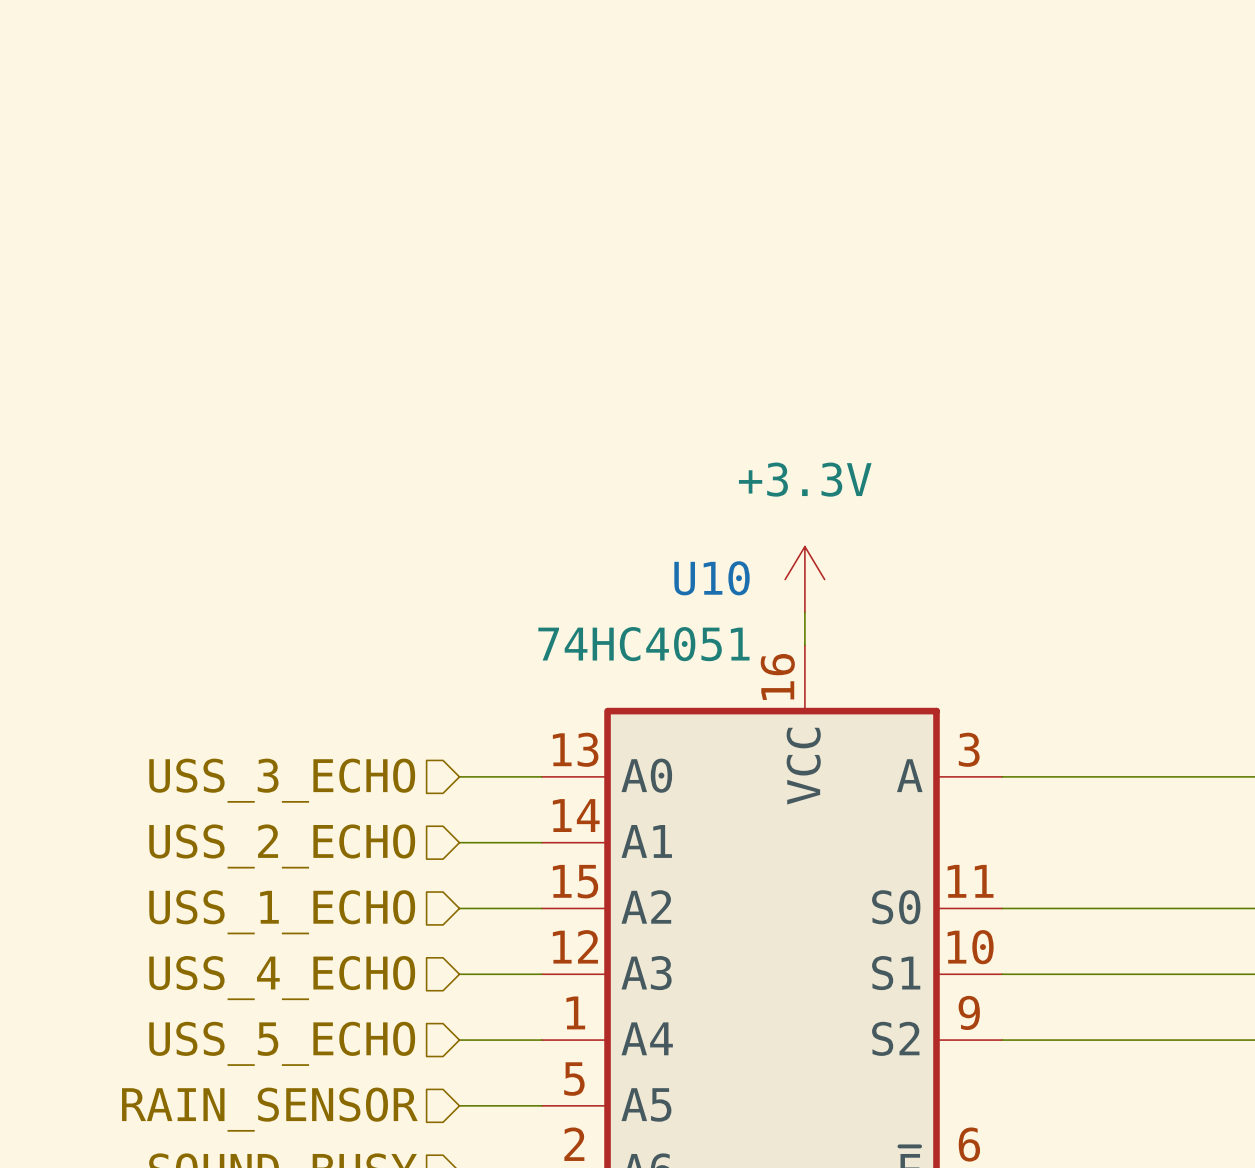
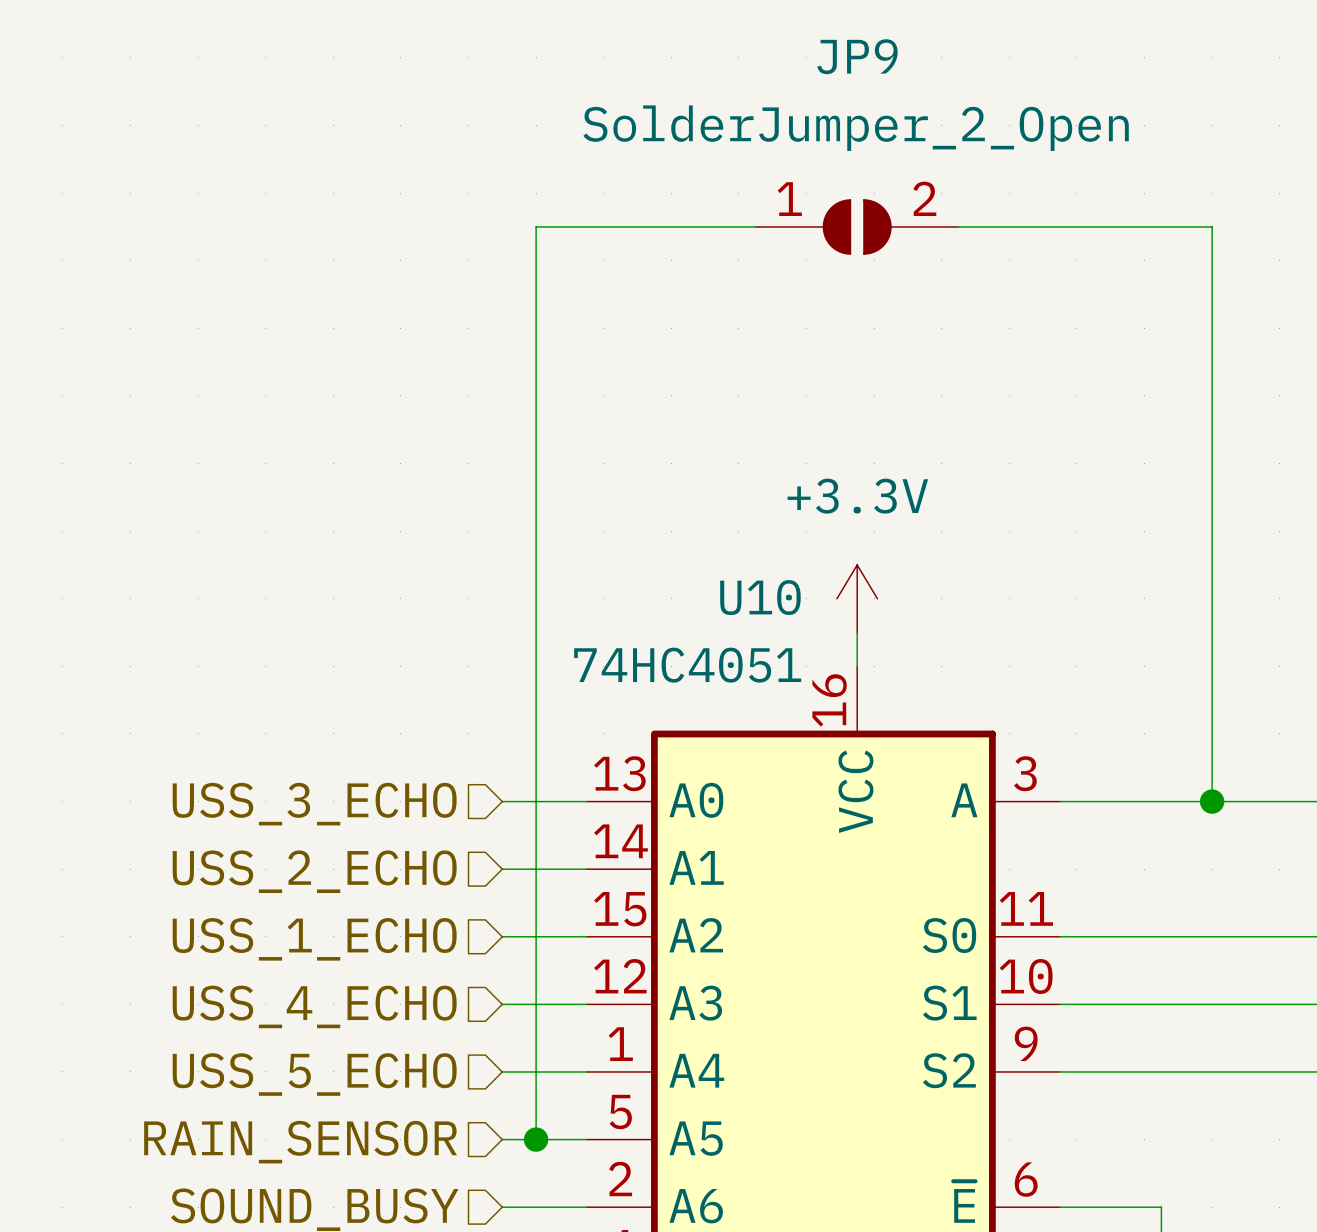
wire: none -> (755, 226) (536, 226) (536, 1139)
JP9: none -> SolderJumper_2_Open (857, 226)
wire: none -> (958, 226) (1212, 226) (1212, 801)
junction: none -> (1212, 801)
junction: none -> (536, 1139)

